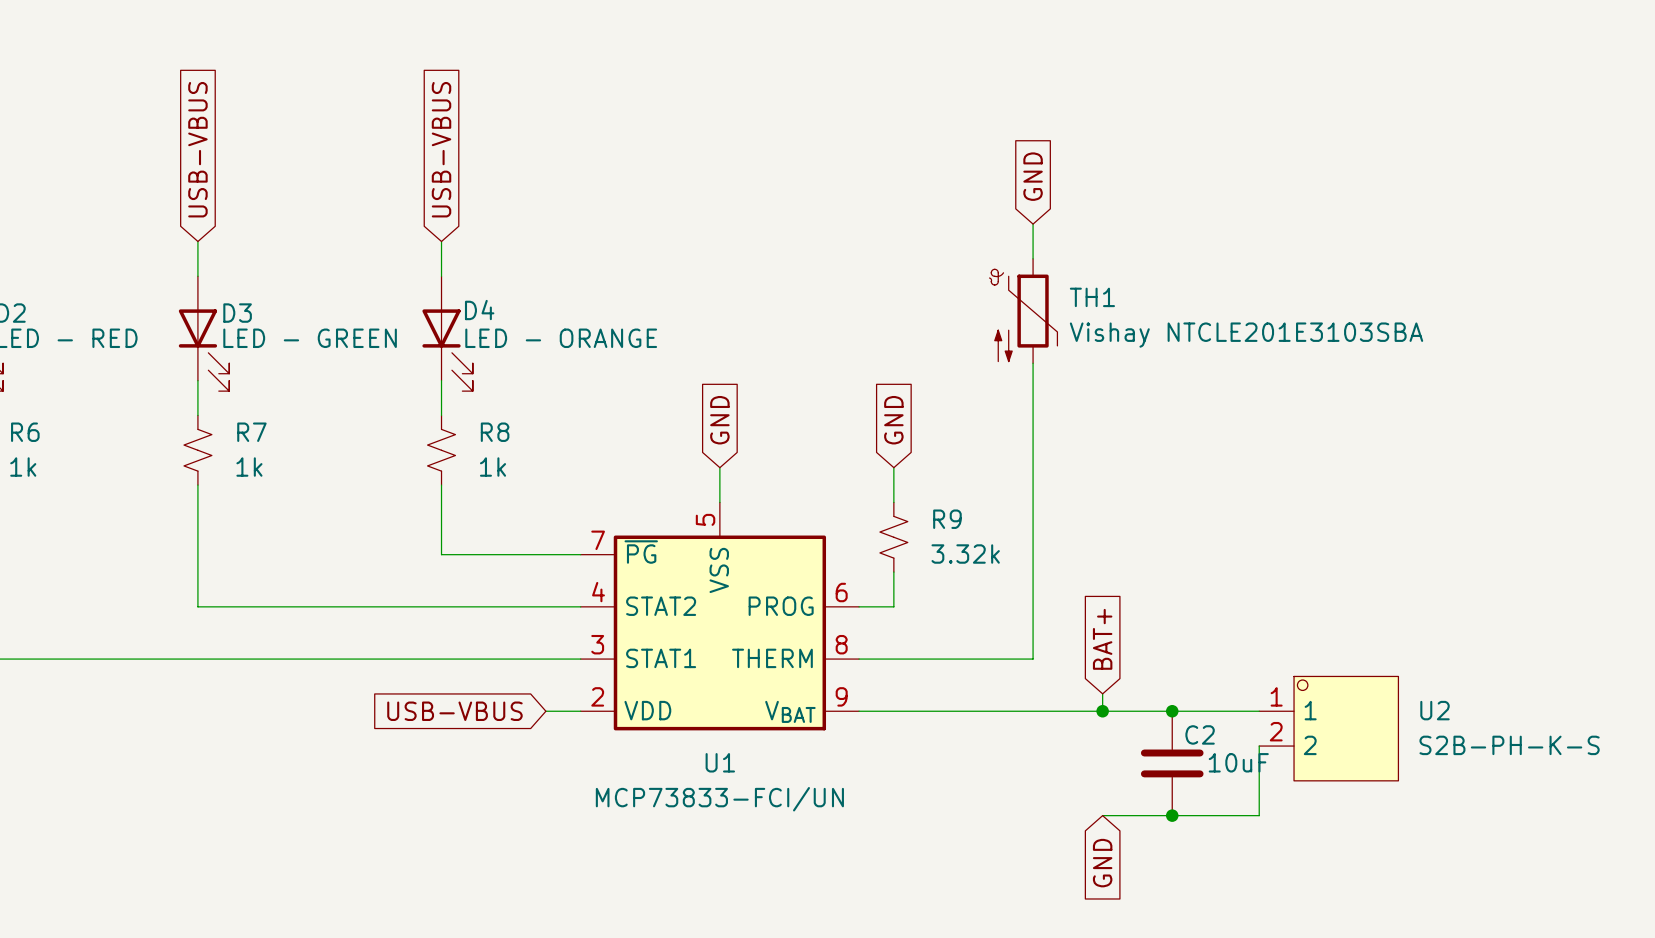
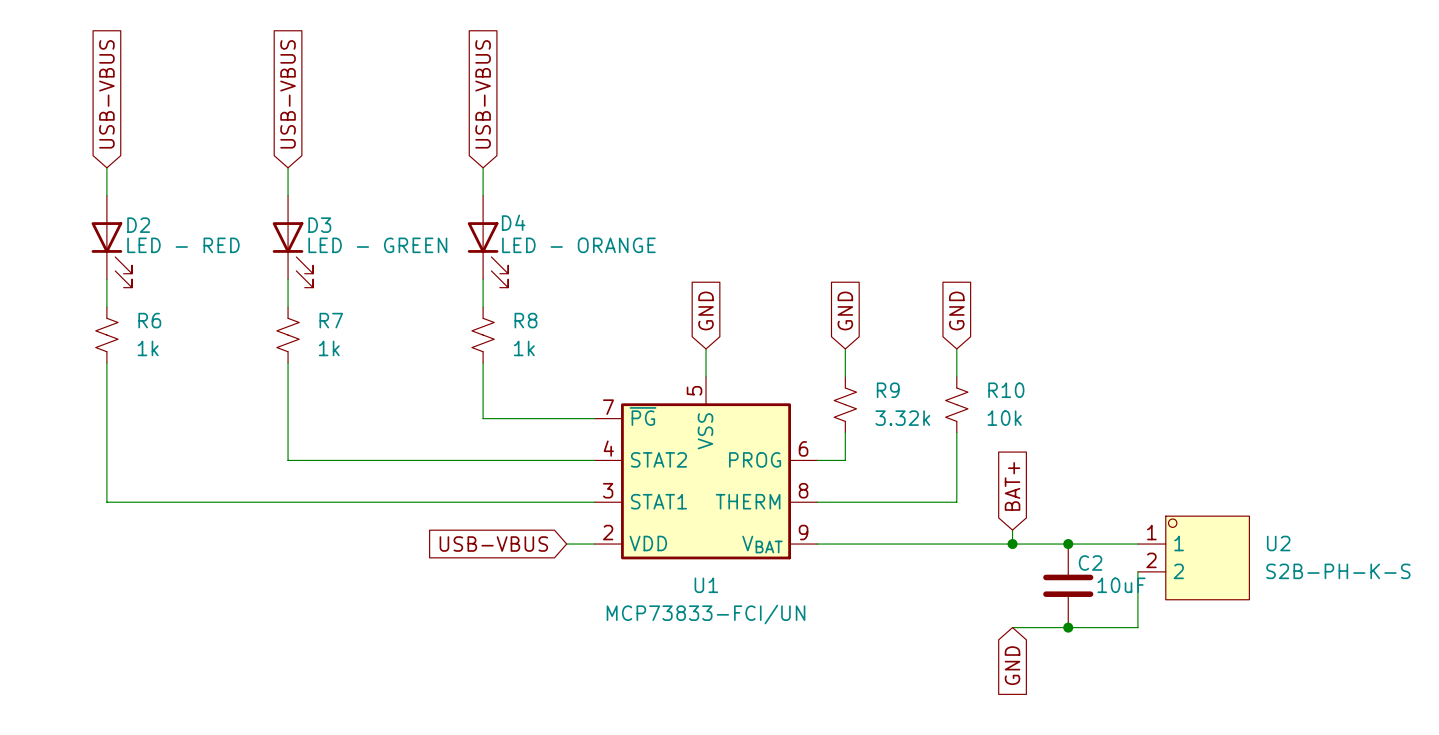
global label position: GND (1033, 176) -> GND (956, 310)
wire: (1033, 224) (1033, 258) -> none
TH1: Vishay NTCLE201E3103SBA (1023, 311) -> none
wire: (1033, 363) (1033, 467) -> none
wire: (1033, 502) (1033, 572) -> none
R10: none -> 10k (956, 404)

